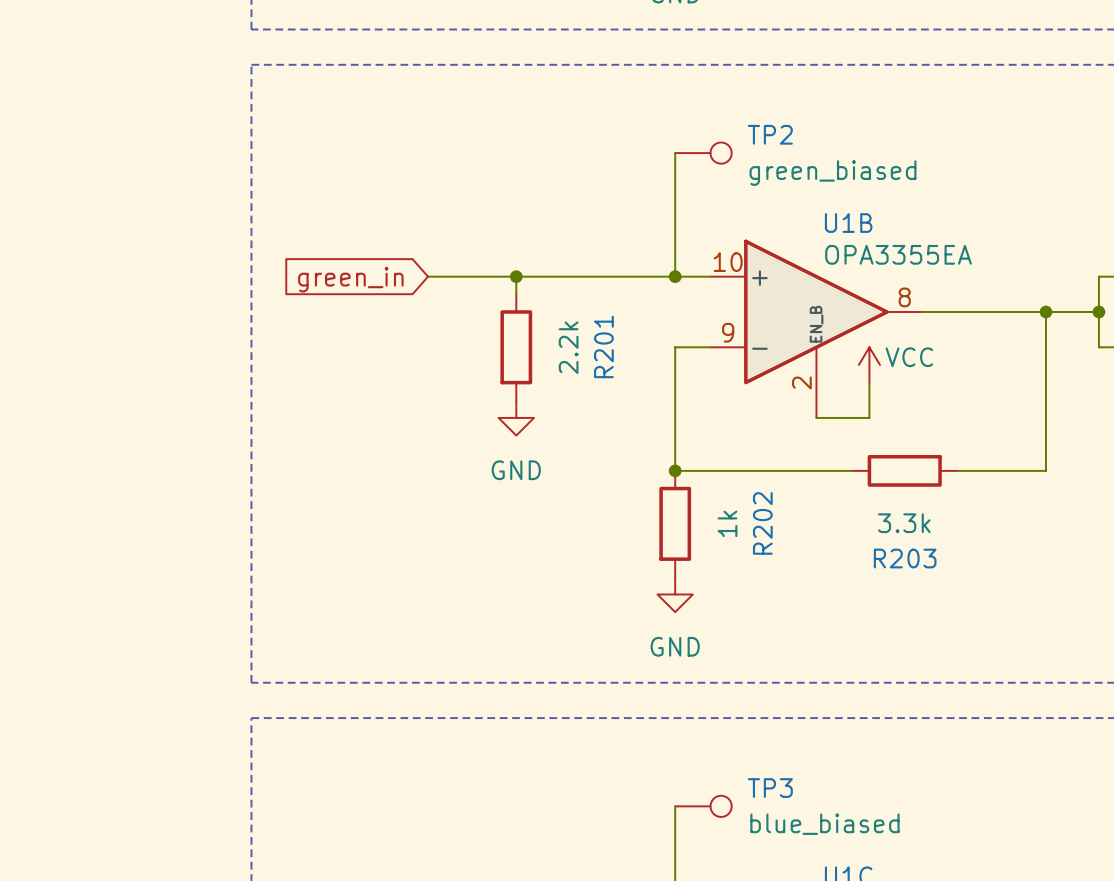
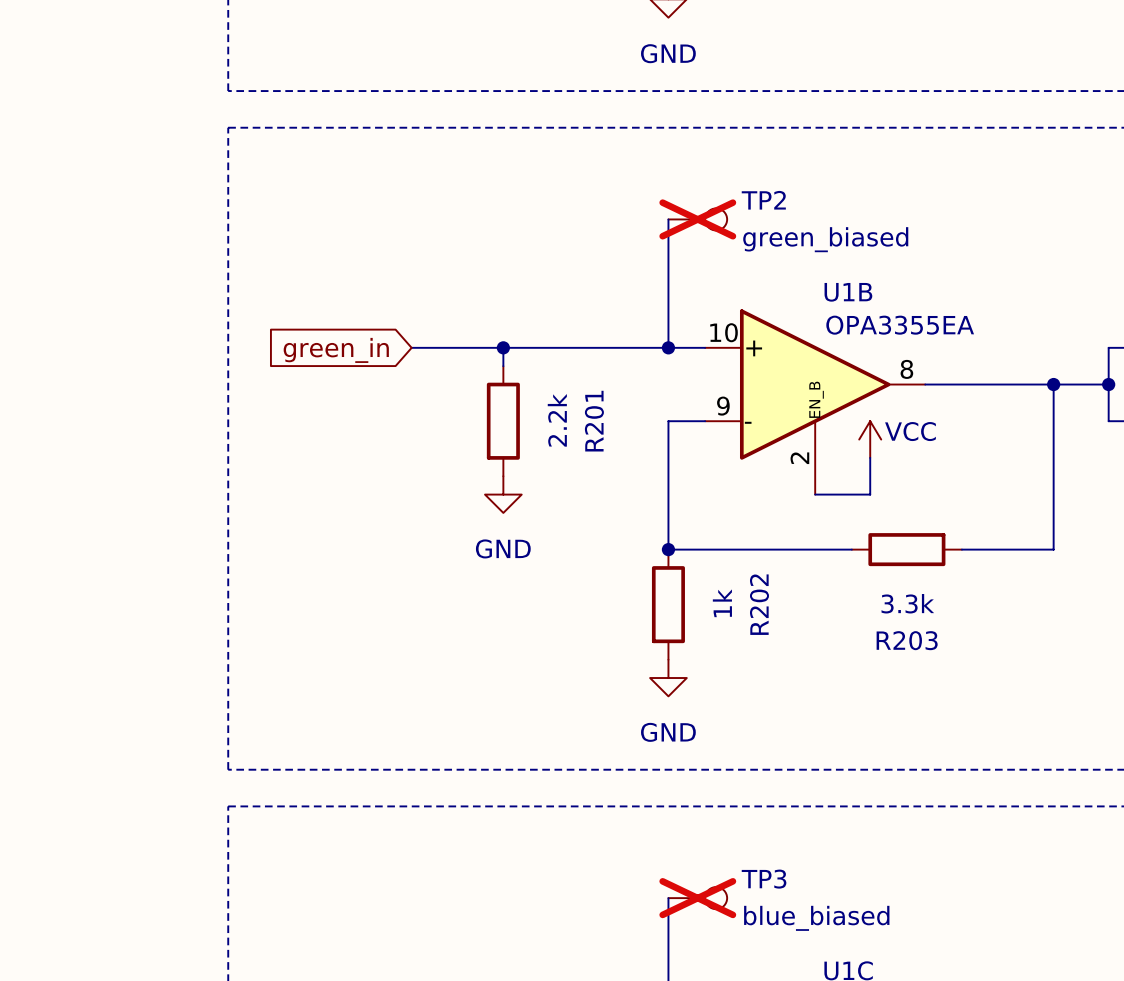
TP2 do-not-place cross: none -> (697, 219)
TP3 do-not-place cross: none -> (697, 898)

